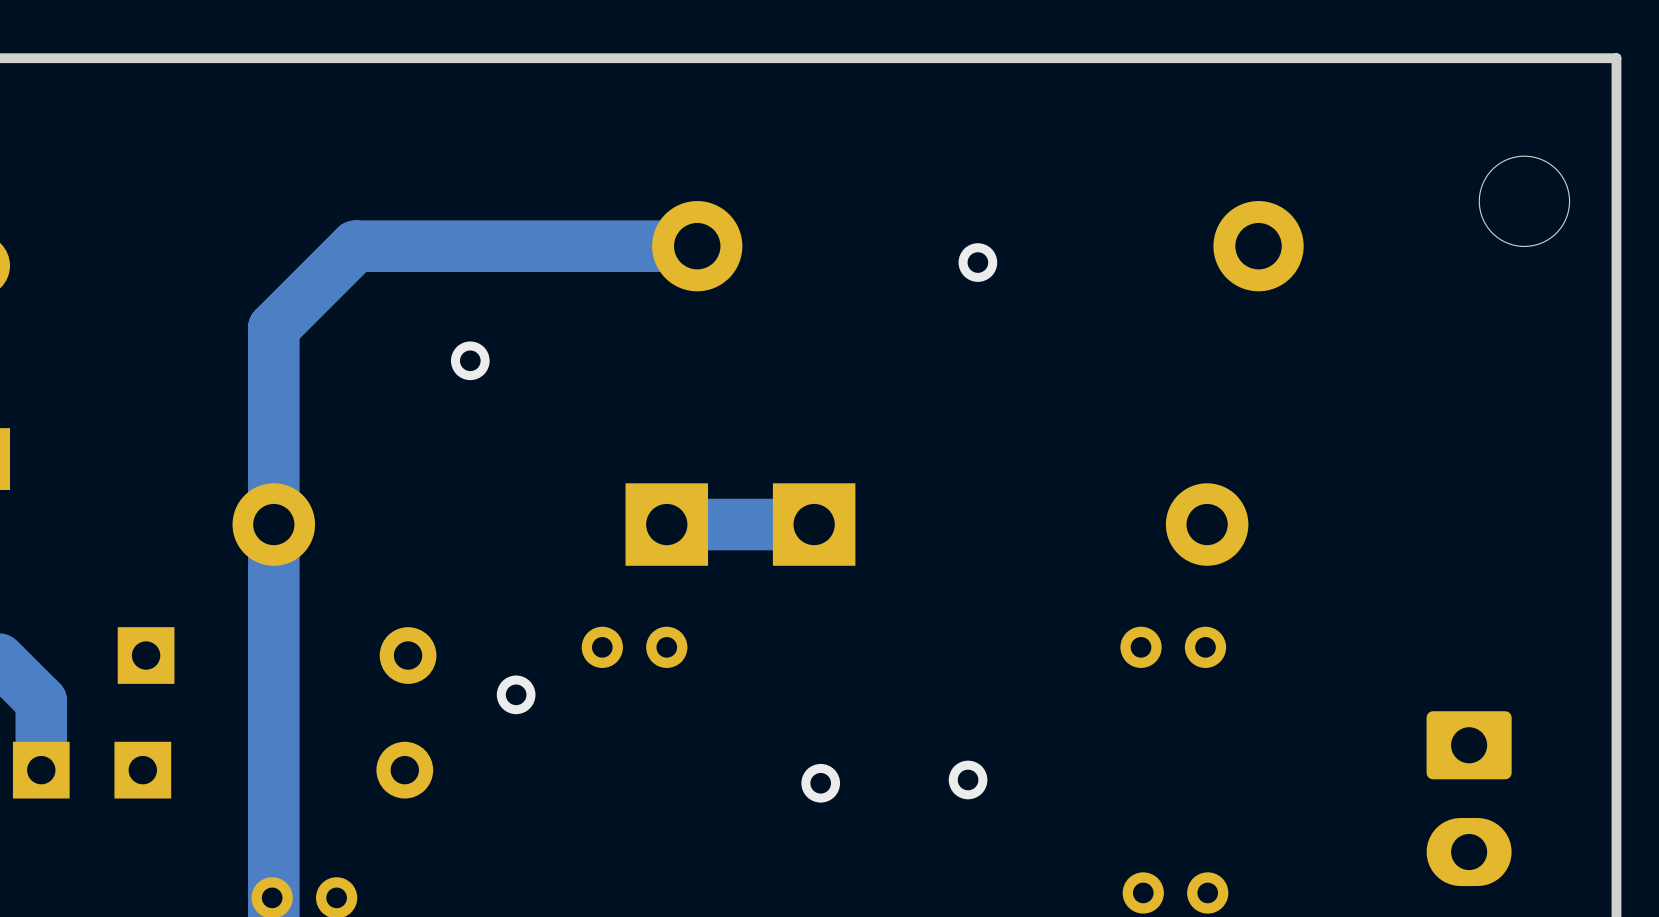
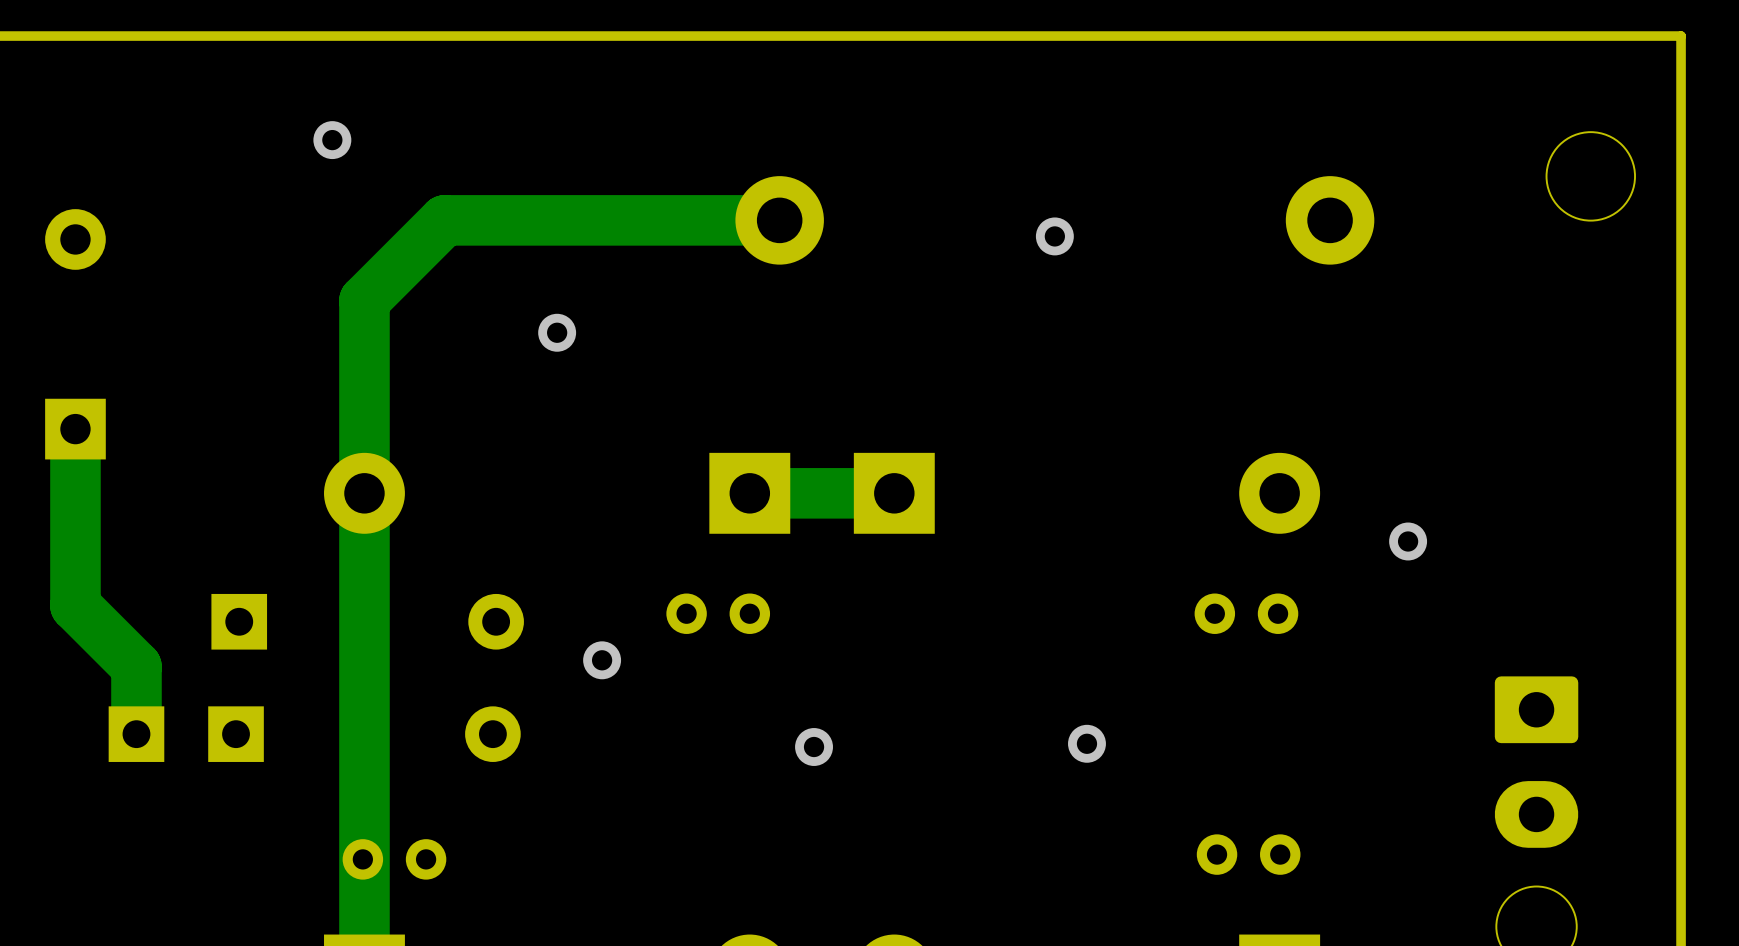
via: none -> (332, 140)
via: none -> (1408, 541)
via position: (968, 779) -> (1086, 743)
via position: (820, 783) -> (814, 747)

